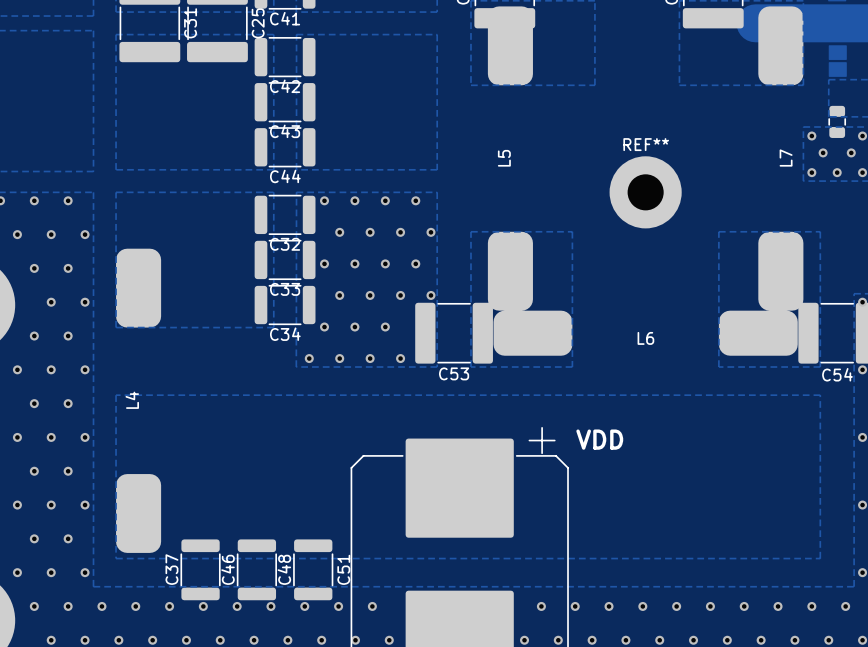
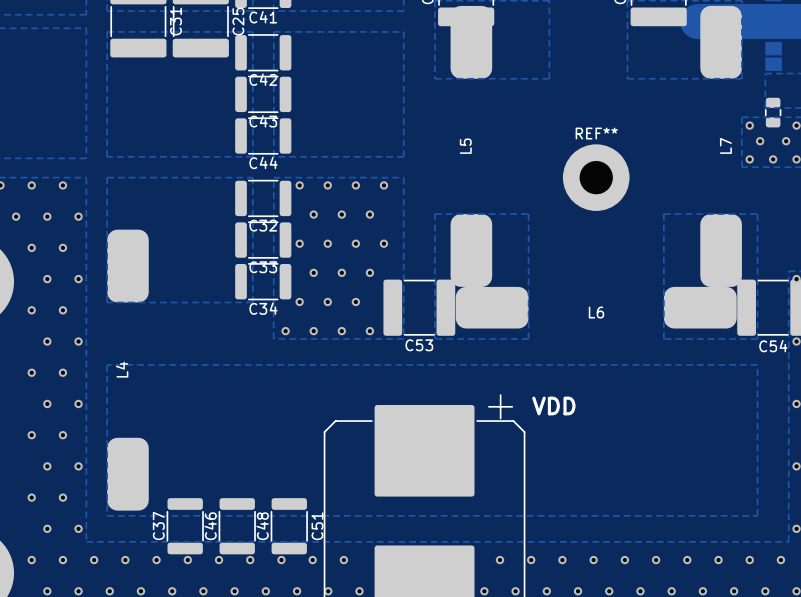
via: (430, 232) -> none
via: (430, 295) -> none
via: (17, 369) -> none
via: (17, 437) -> none
via: (17, 505) -> none
via: (17, 572) -> none

